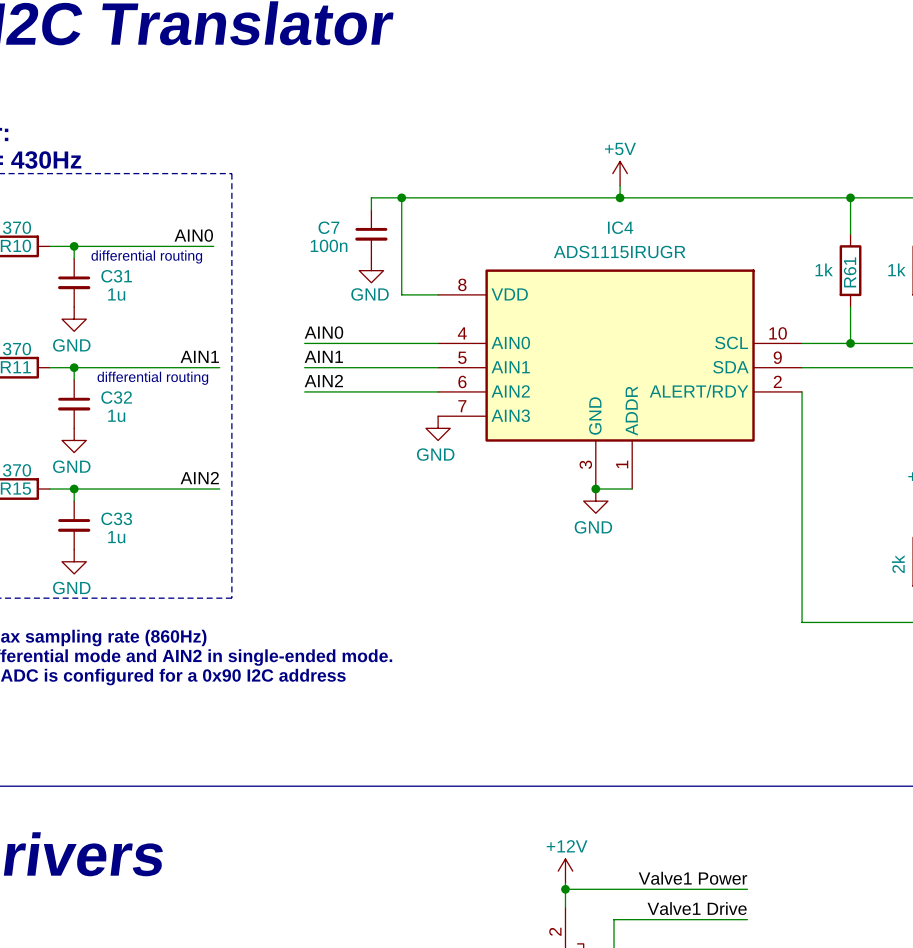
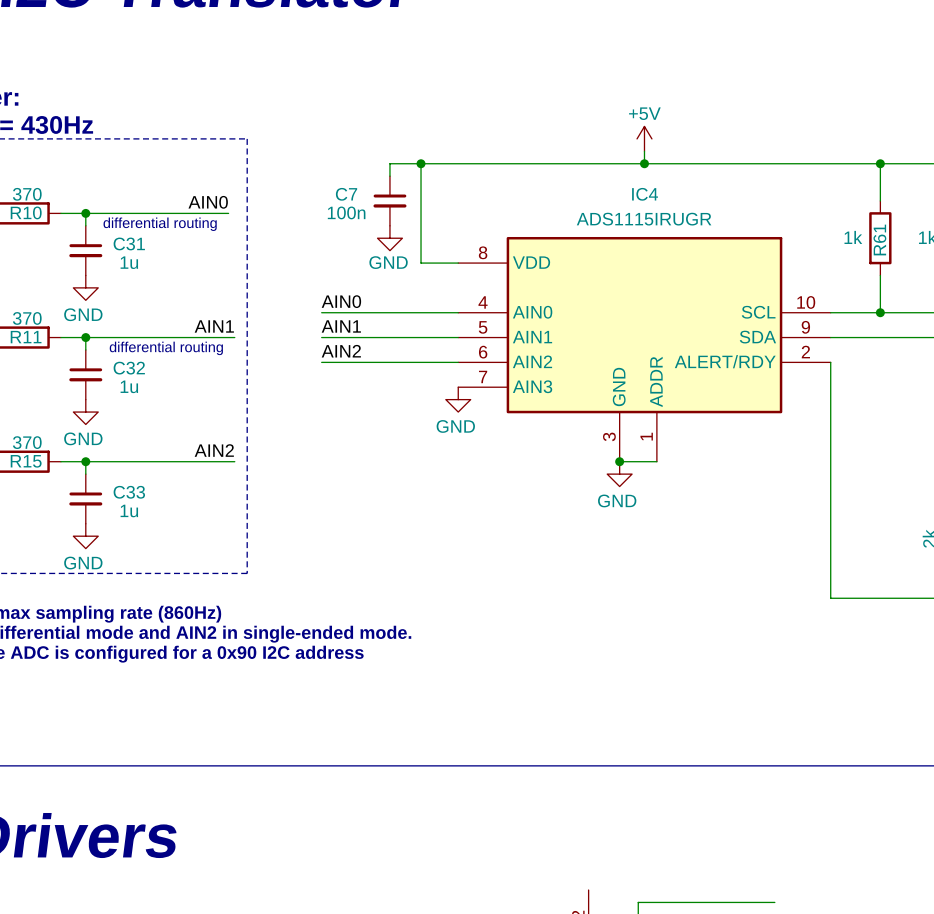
power symbol: +12V (565, 871) -> none
label: Valve1 Power (692, 878) -> none
wire: (565, 883) (565, 907) -> none
wire: (565, 889) (747, 889) -> none
junction: (565, 889) -> none
label: Valve1 Drive (697, 908) -> none

